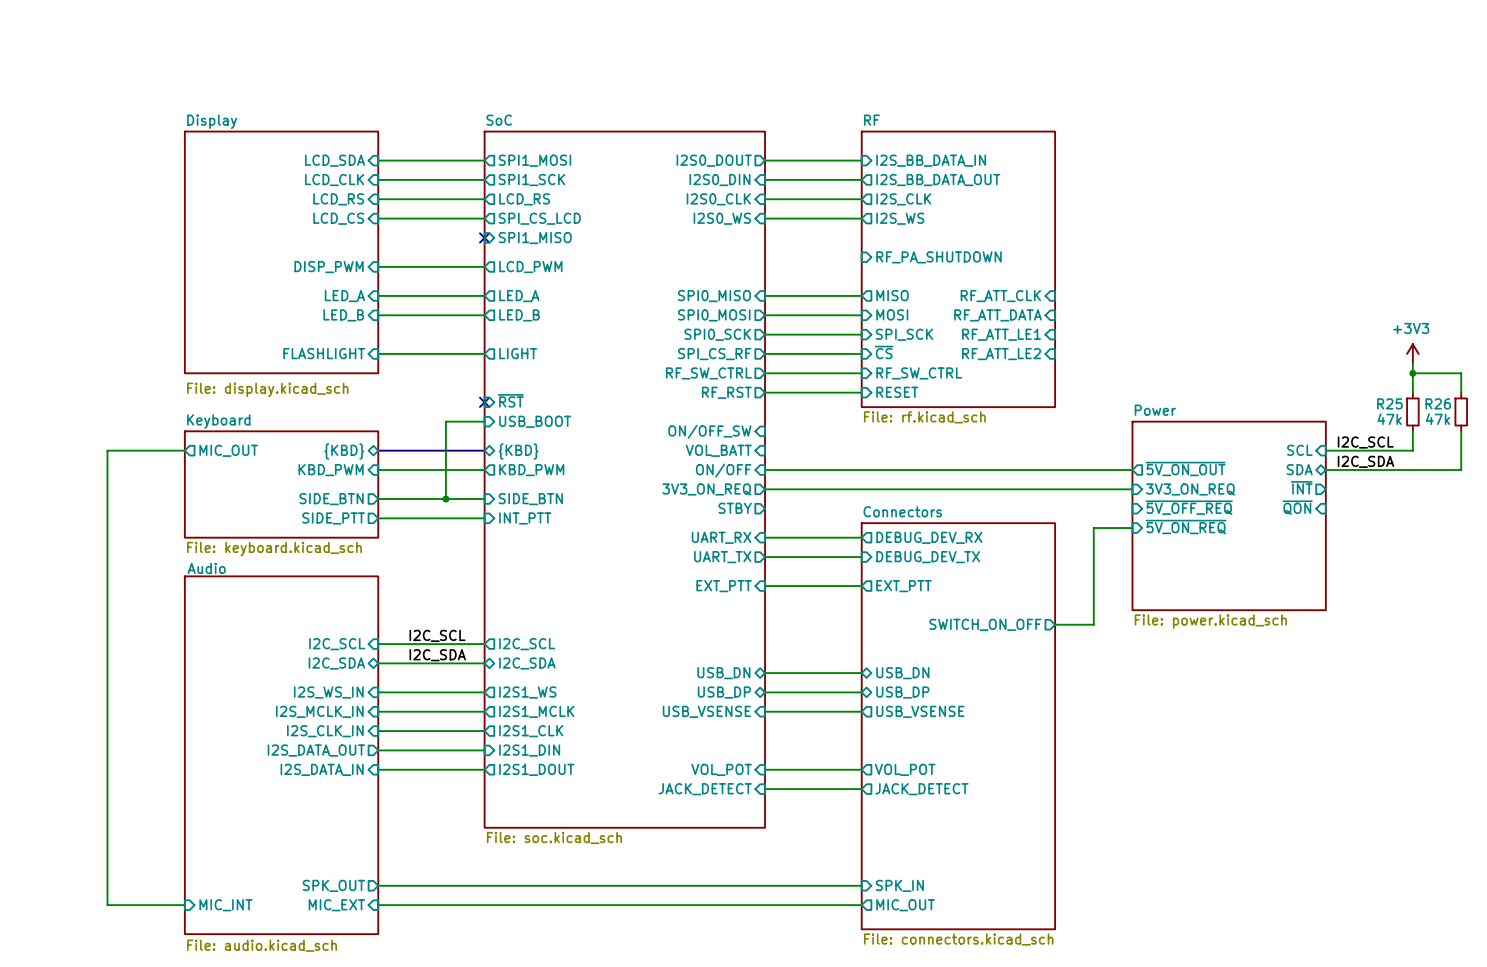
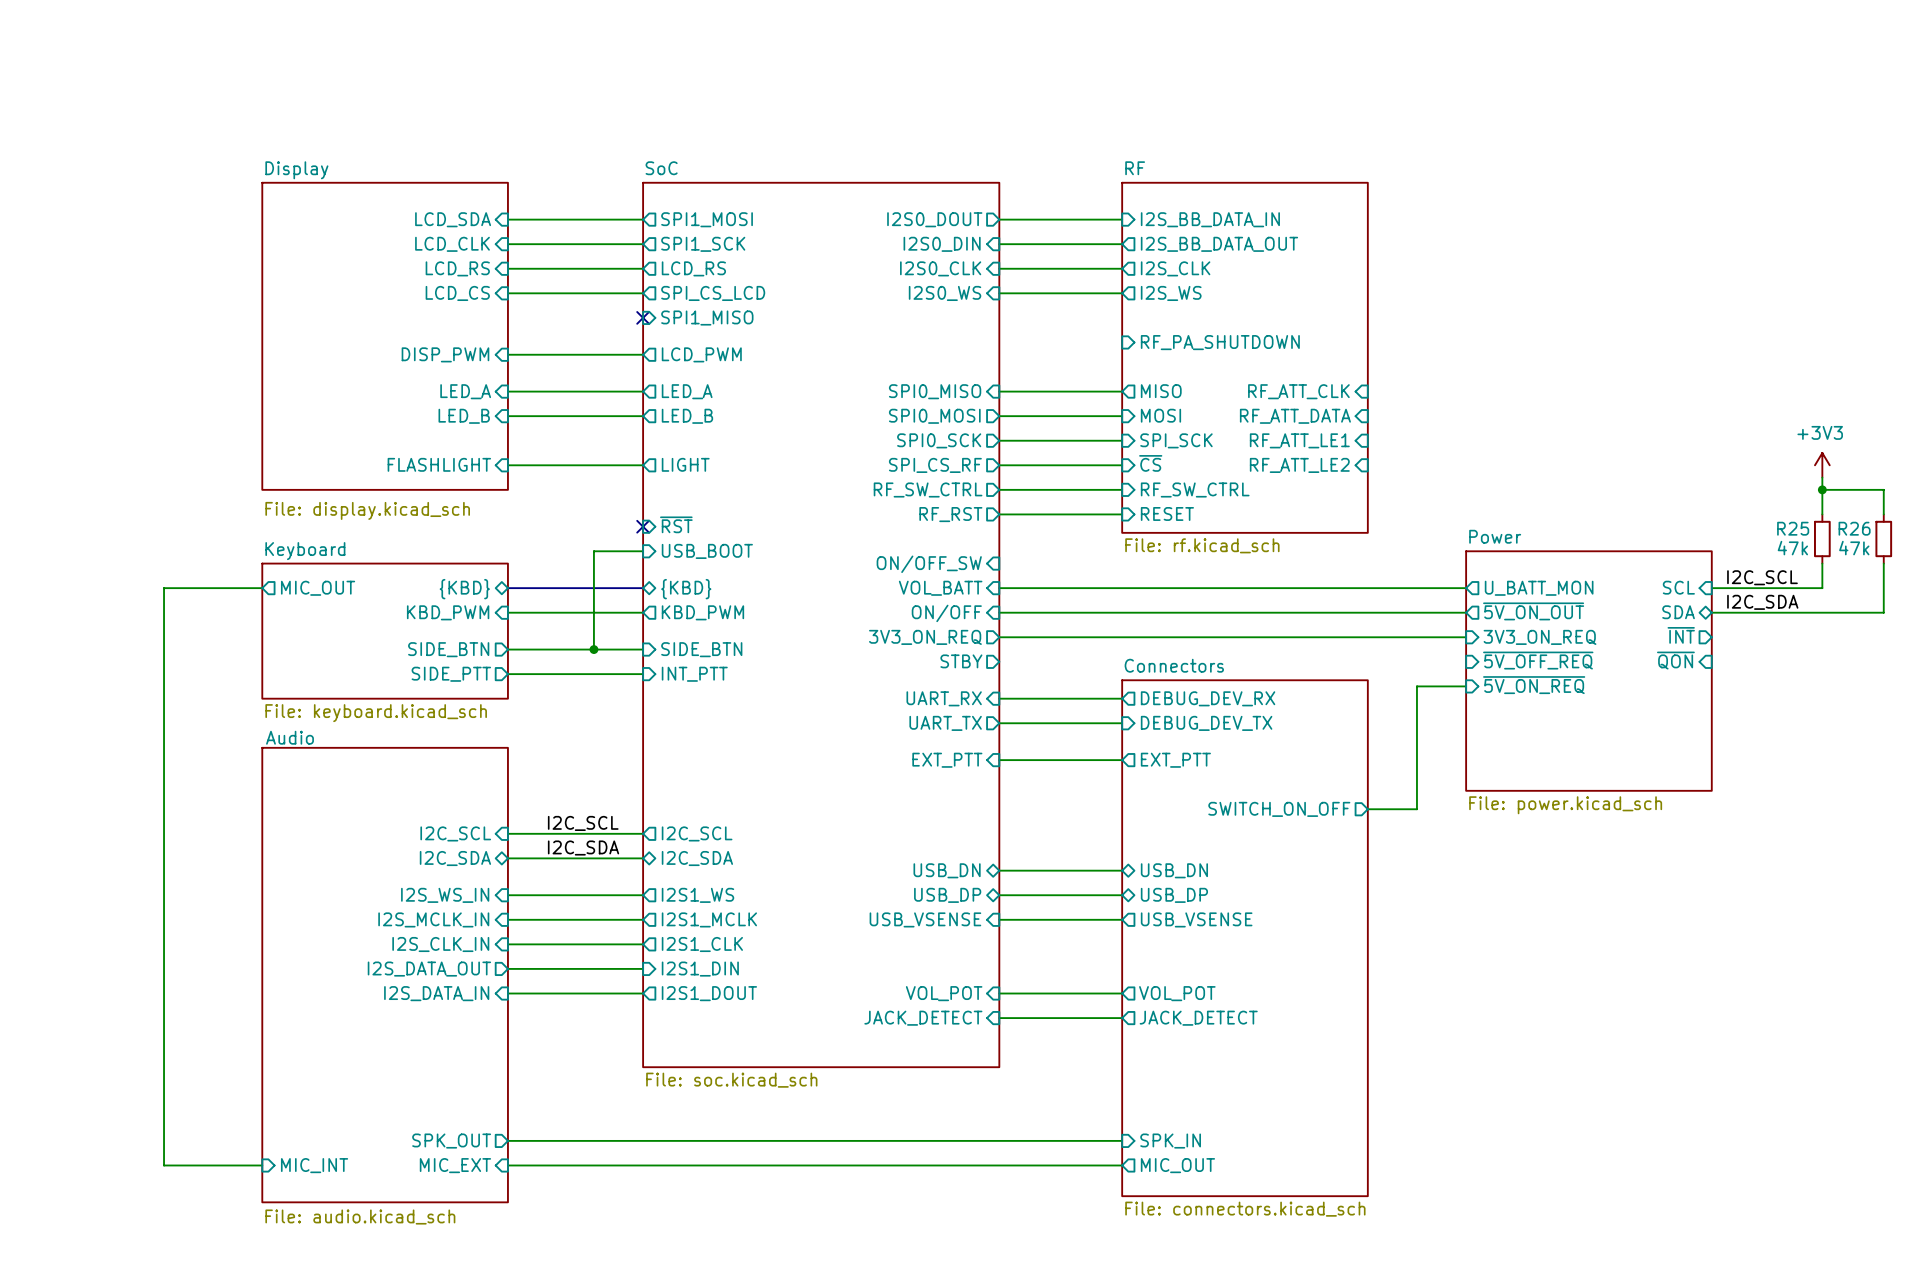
wire: none -> (999, 588) (1466, 588)
sheet pin: none -> U_BATT_MON (1539, 588)

